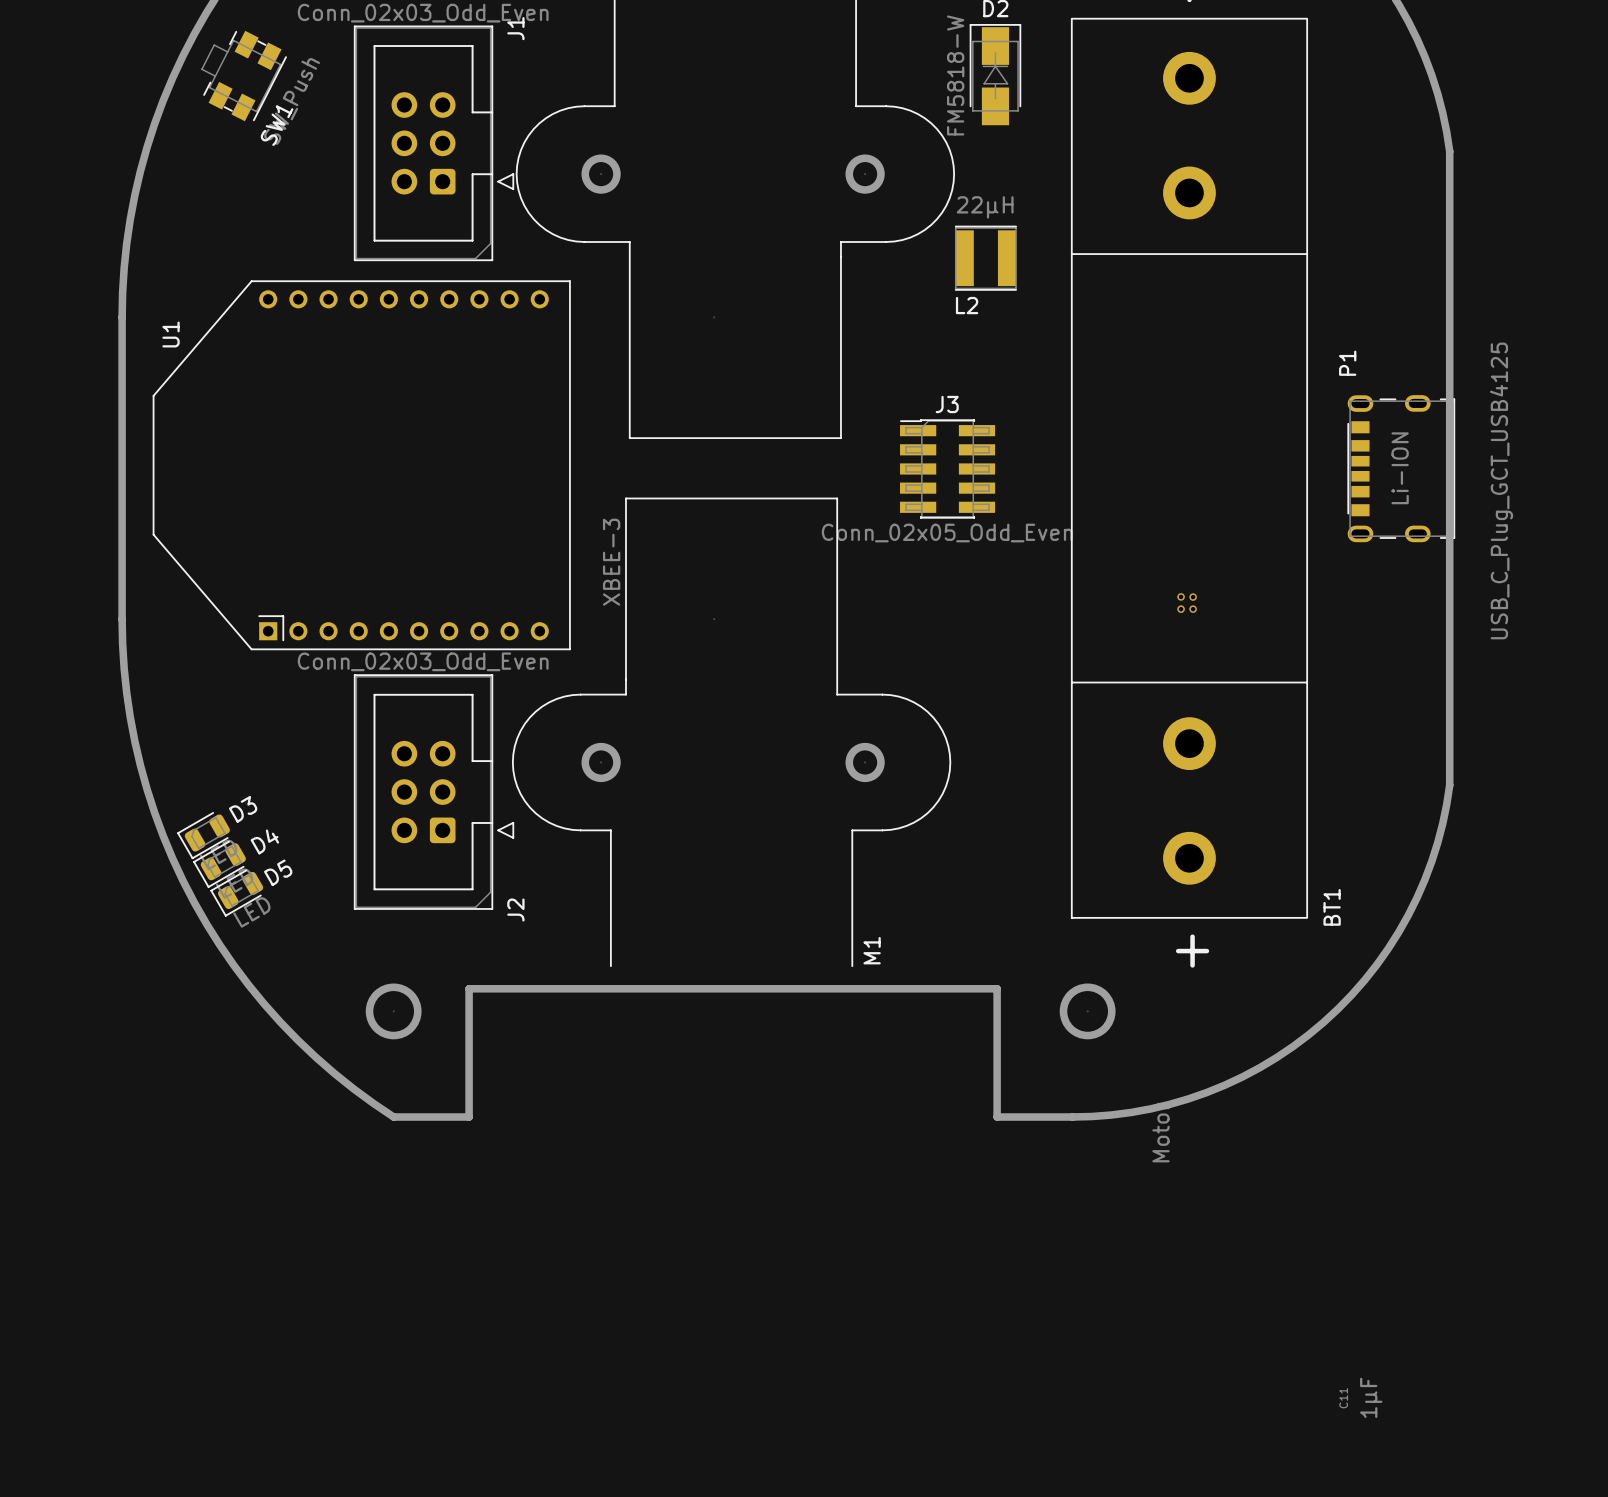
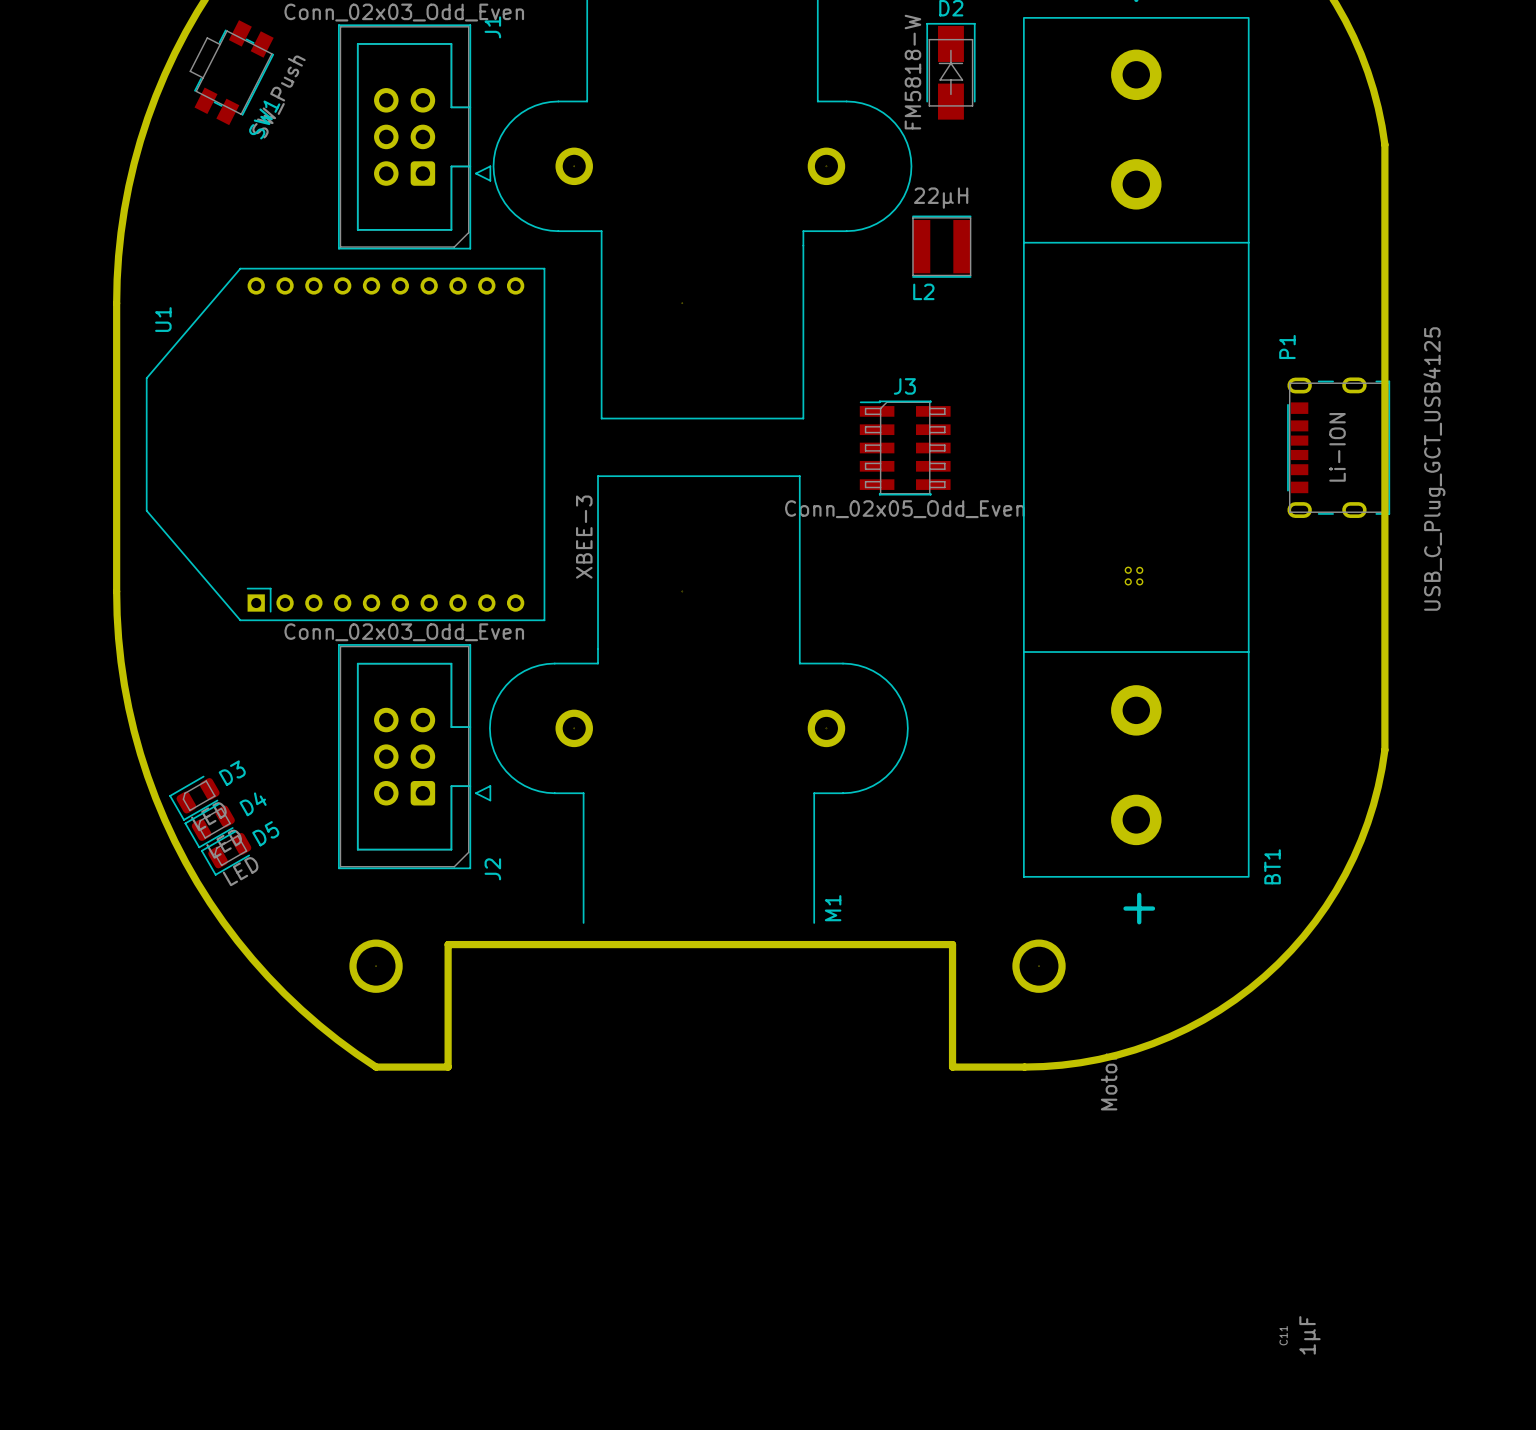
SW1 footprint: [201, 30, 287, 122] -> [189, 20, 275, 126]

